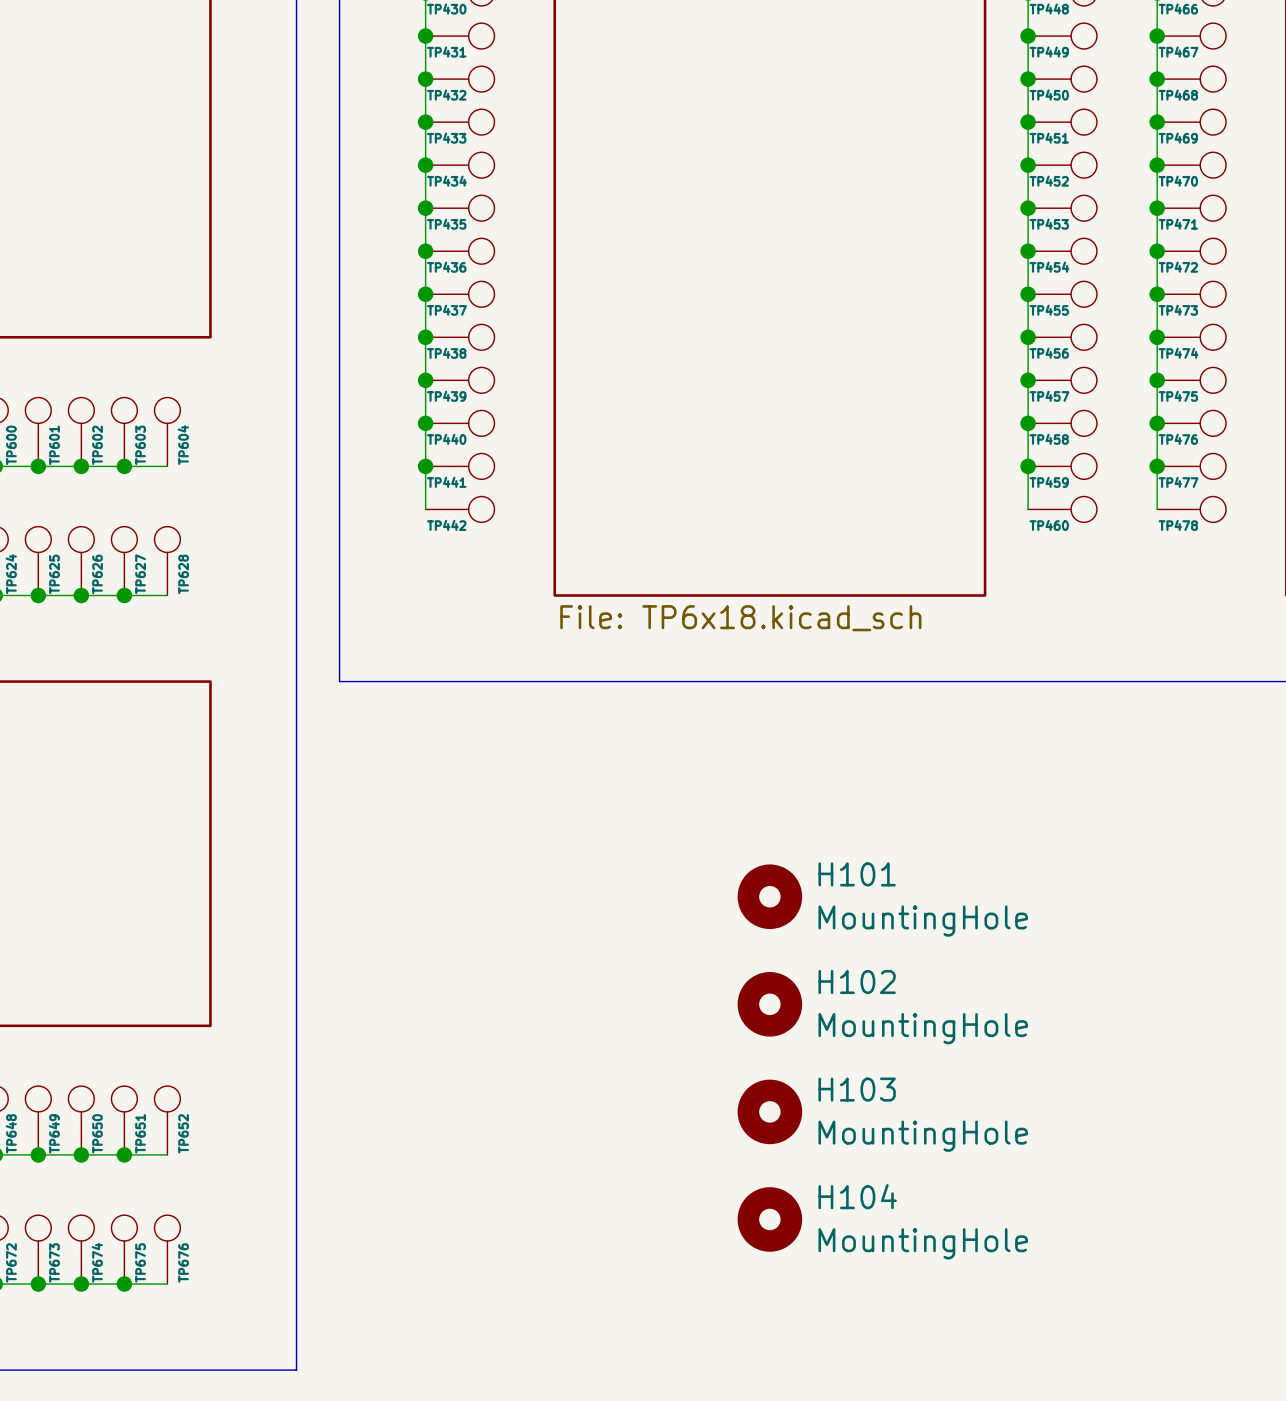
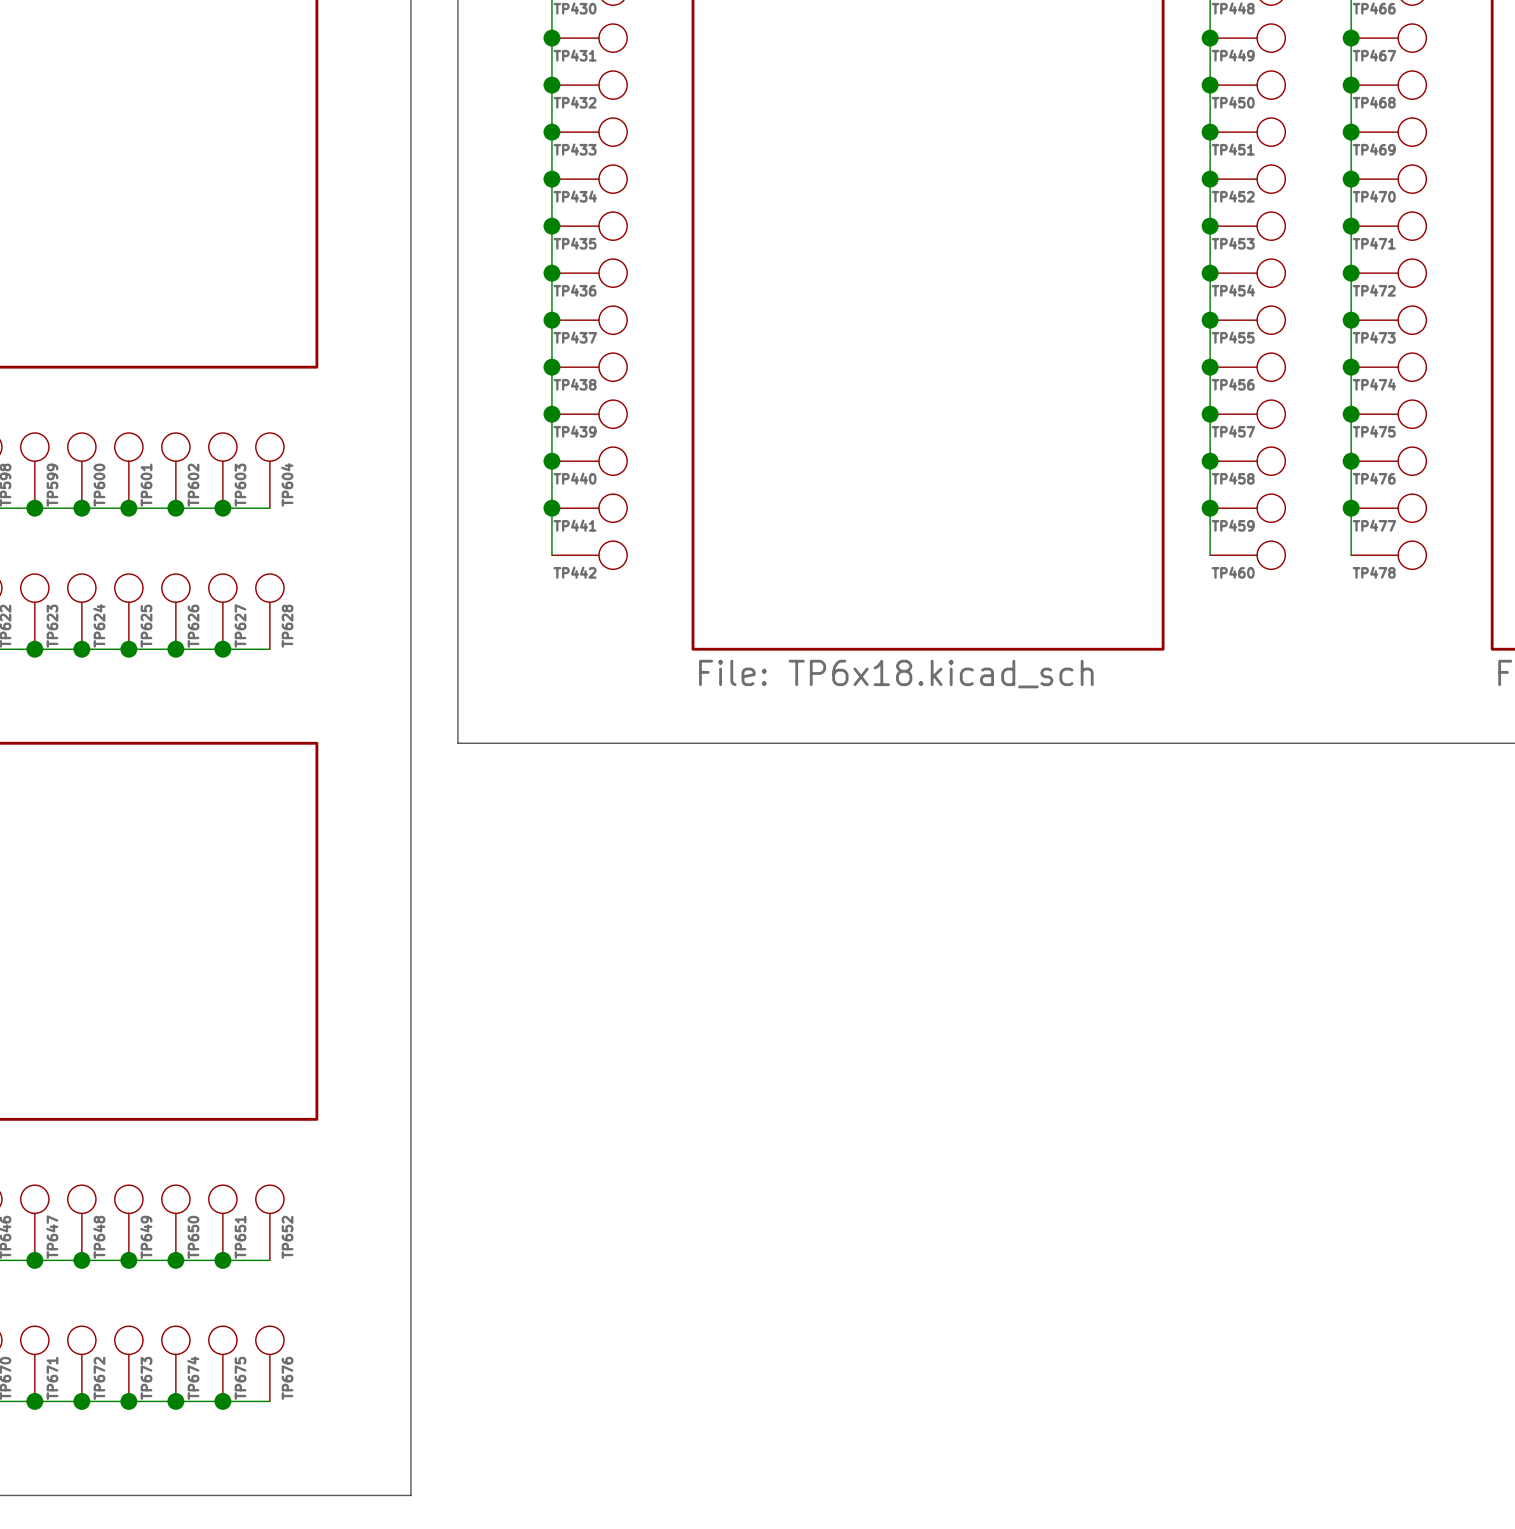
H101: MountingHole (769, 896) -> none
H102: MountingHole (769, 1004) -> none
H103: MountingHole (769, 1111) -> none
H104: MountingHole (769, 1219) -> none

